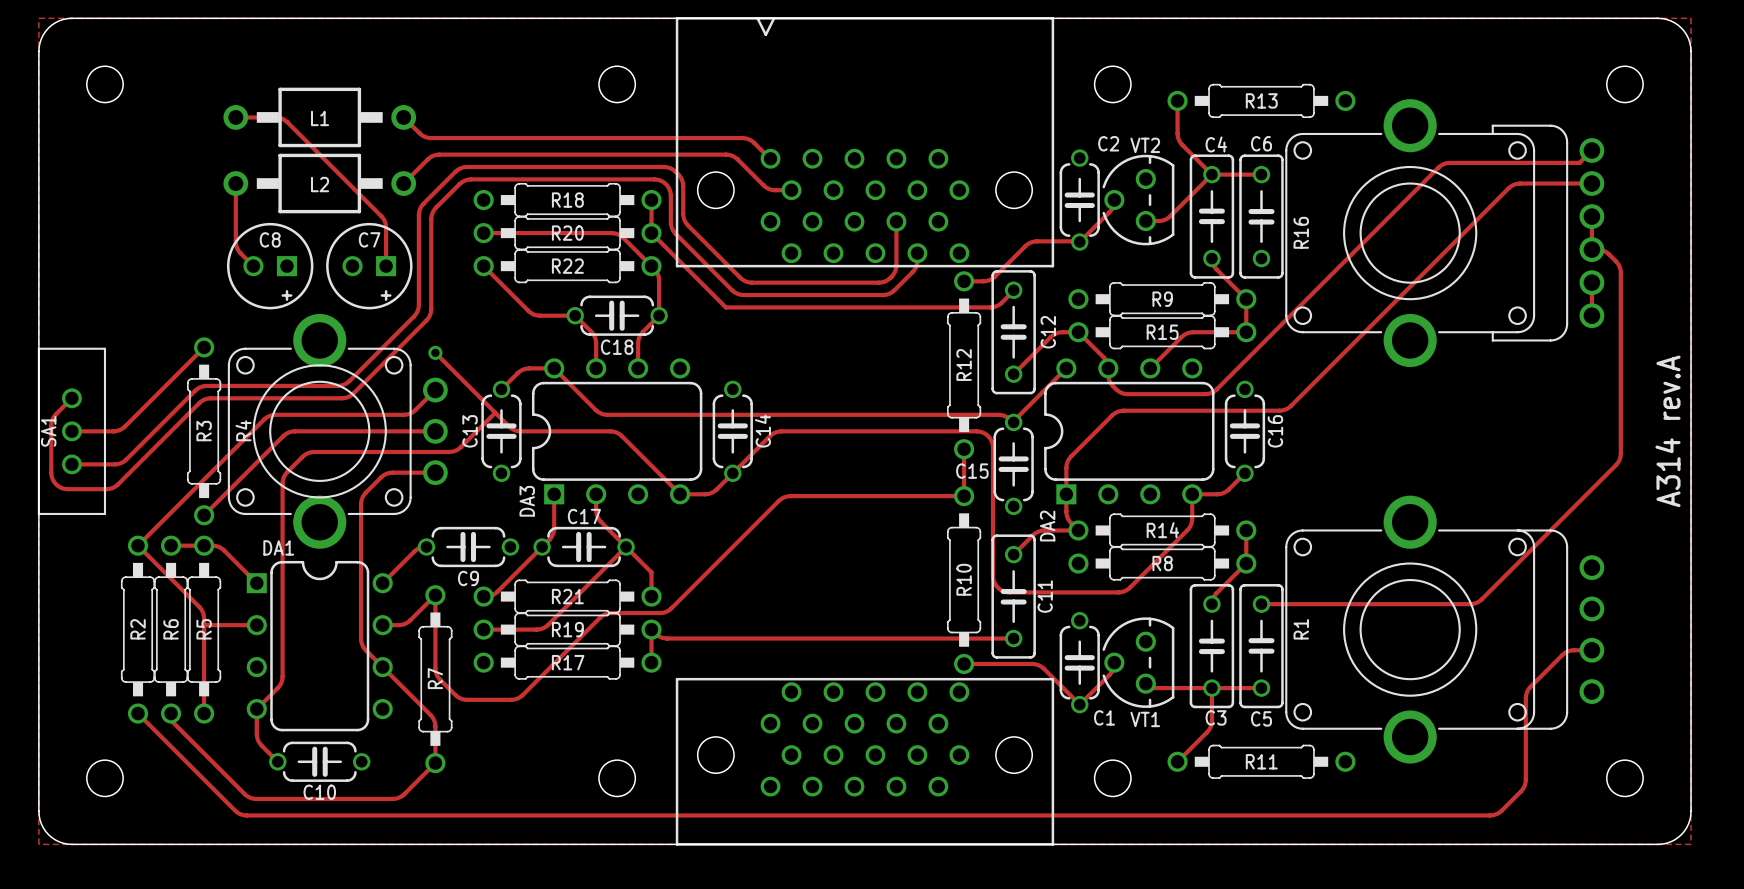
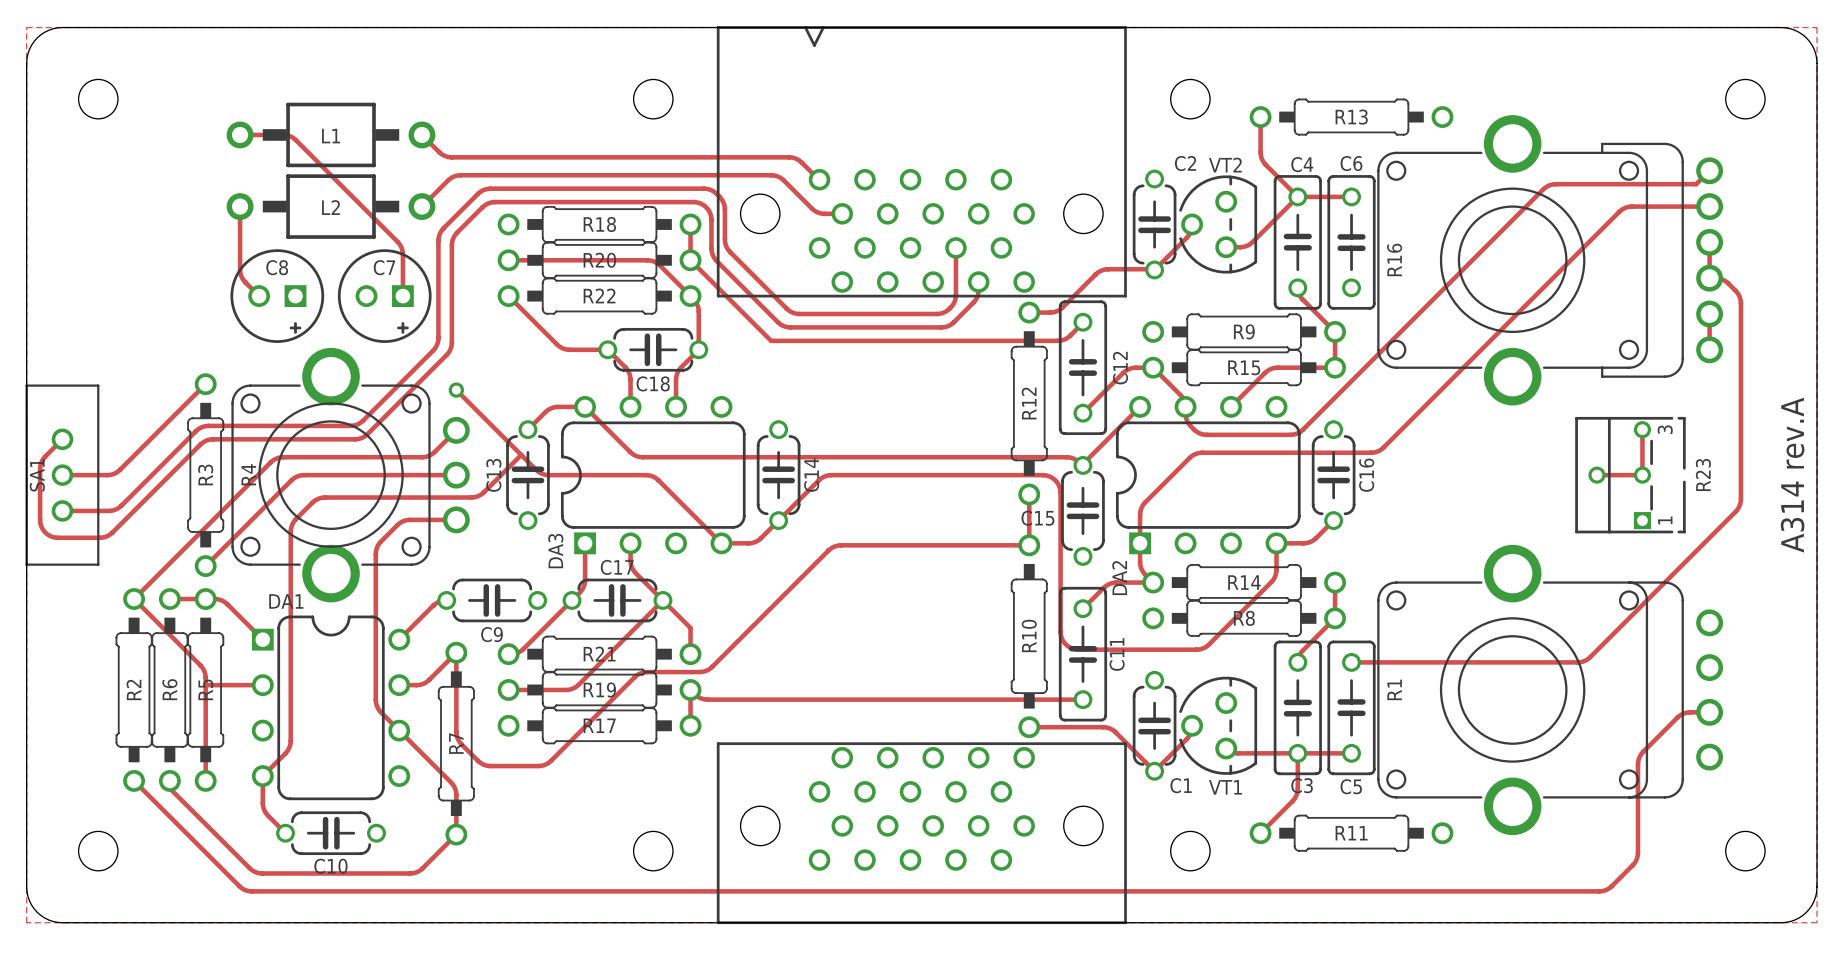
track: none -> (1642, 429) (1642, 475) (1596, 475)
R23: none -> (1630, 475)

